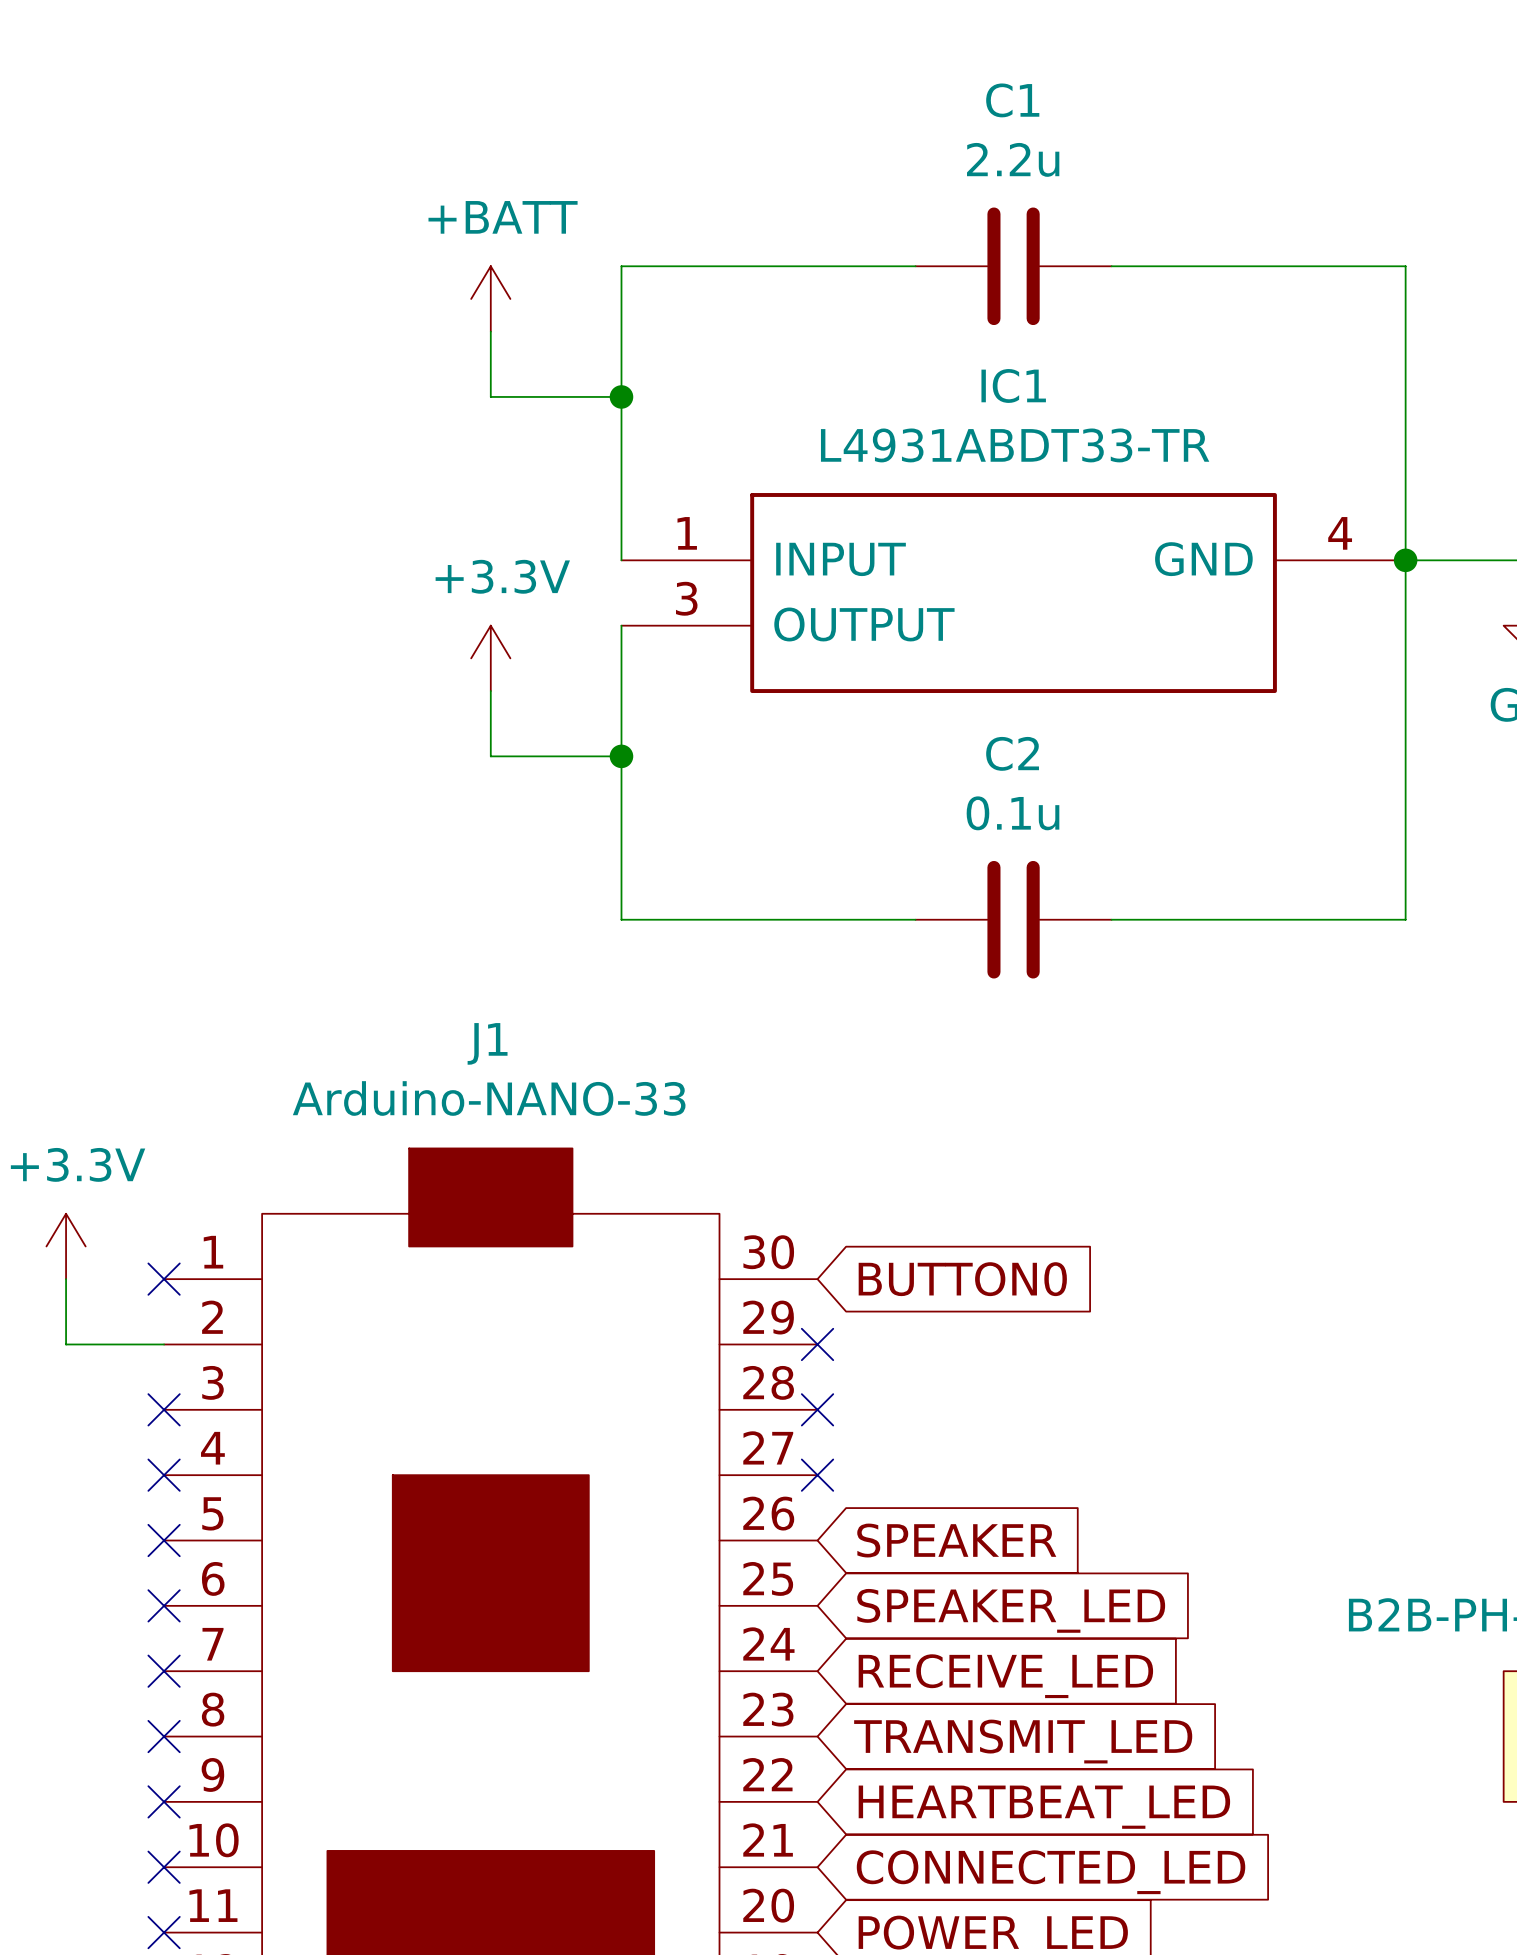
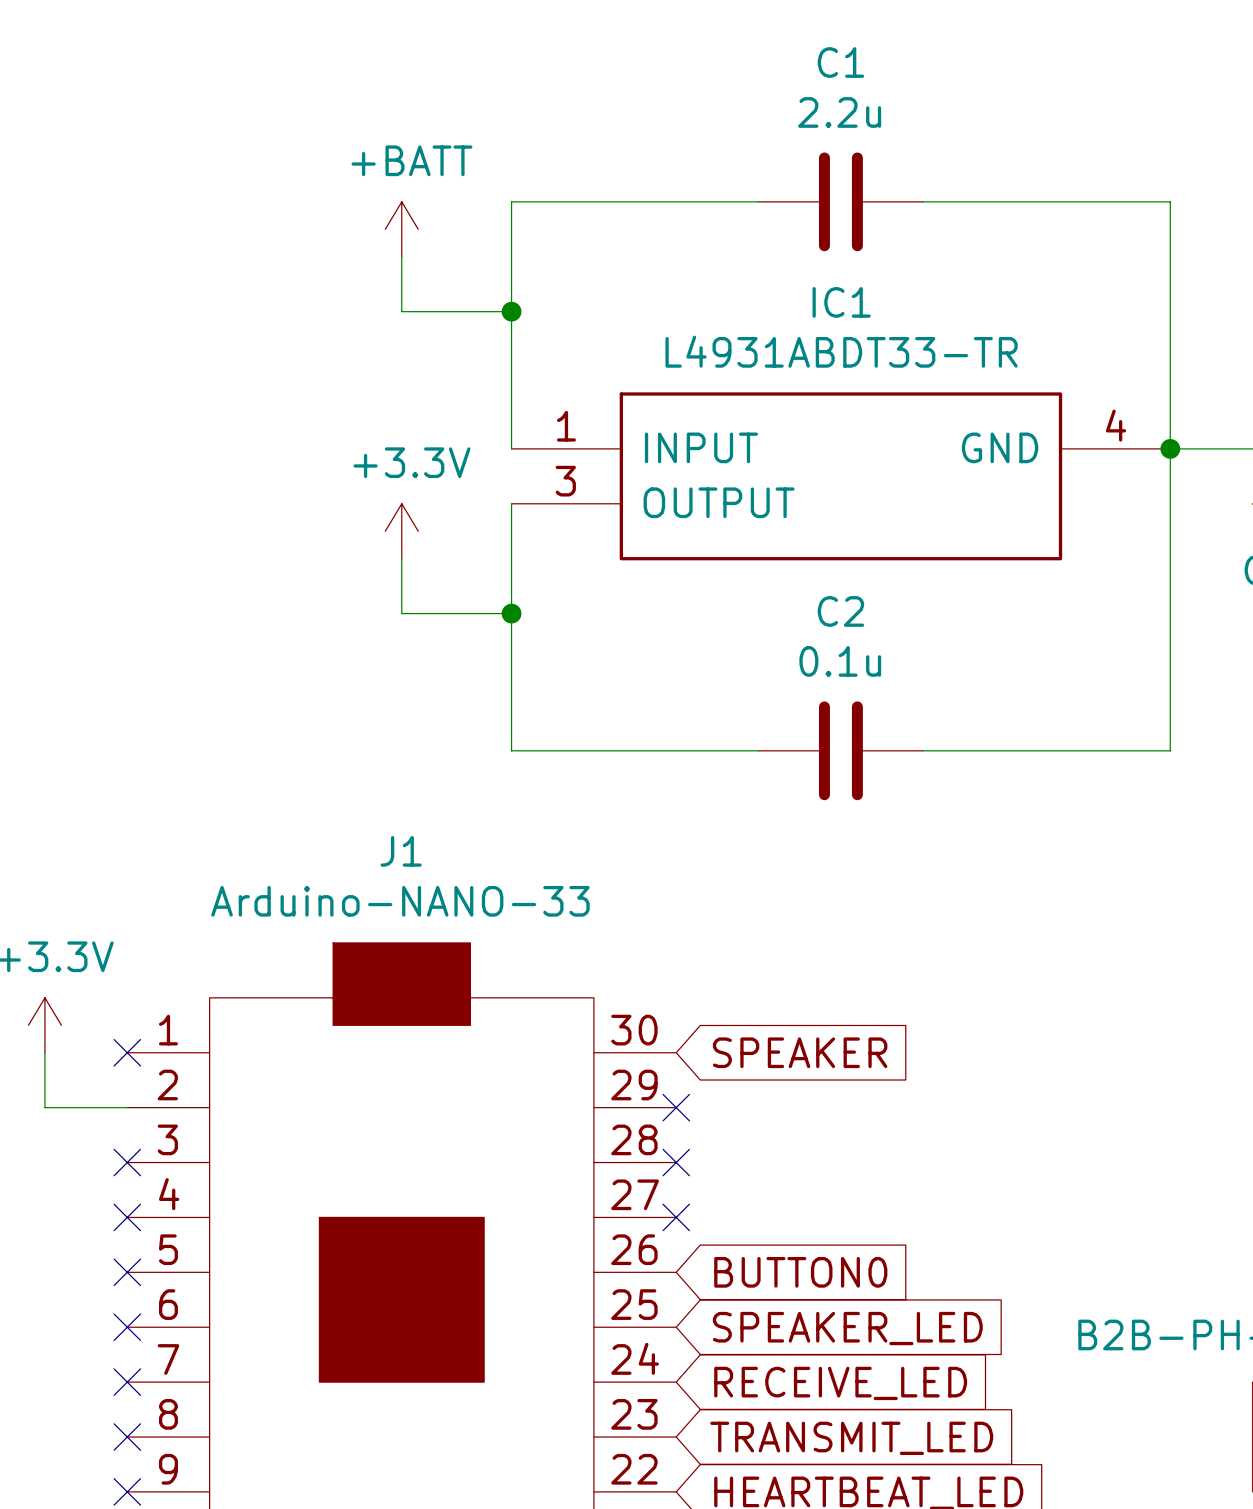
global label: BUTTON0 (962, 1279) -> SPEAKER (800, 1052)
global label: SPEAKER (956, 1540) -> BUTTON0 (800, 1272)

